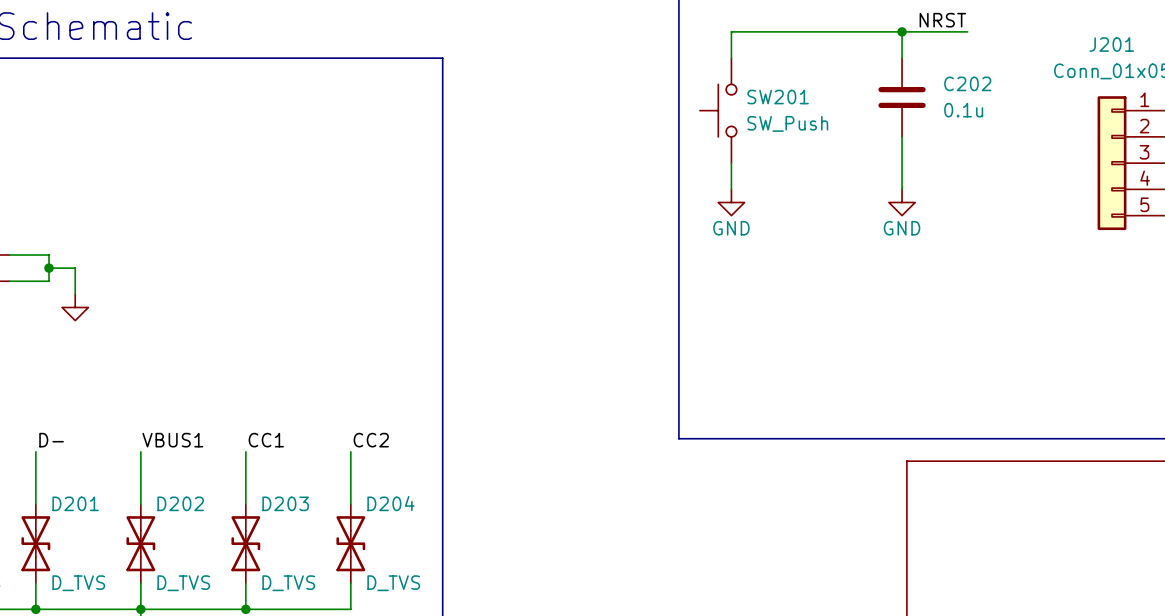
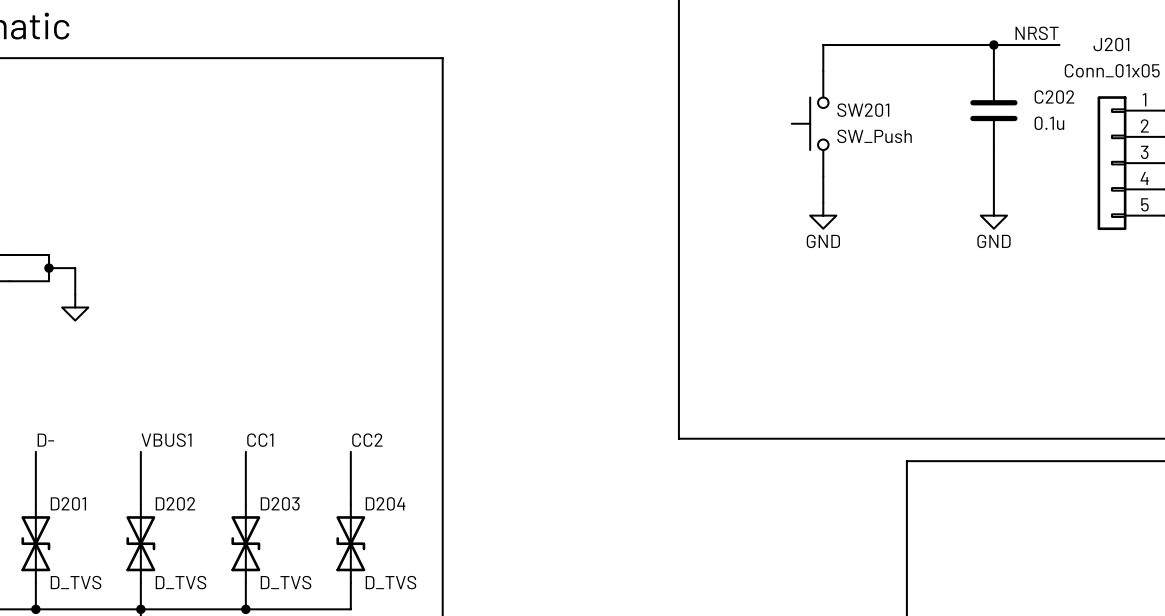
label position: NRST (942, 20) -> NRST (1037, 33)
wire: (902, 31) (902, 58) -> (993, 45) (993, 71)
junction: (902, 31) -> none
wire: (967, 31) (731, 31) (731, 58) -> (1059, 45) (823, 45) (823, 71)
junction: none -> (993, 45)
C202 position: (902, 97) -> (993, 110)
SW201 position: (718, 110) -> (810, 123)
wire: (902, 136) (902, 189) -> (993, 150) (993, 202)
wire: (731, 163) (731, 189) -> (823, 176) (823, 202)
power symbol: GND (731, 202) -> none
power symbol: GND (902, 202) -> none
power symbol: none -> GND (823, 215)
power symbol: none -> GND (993, 215)

